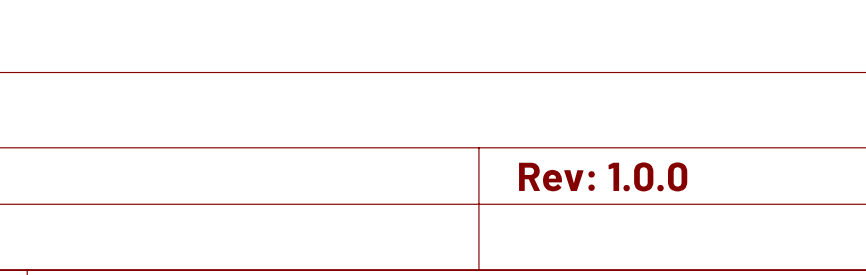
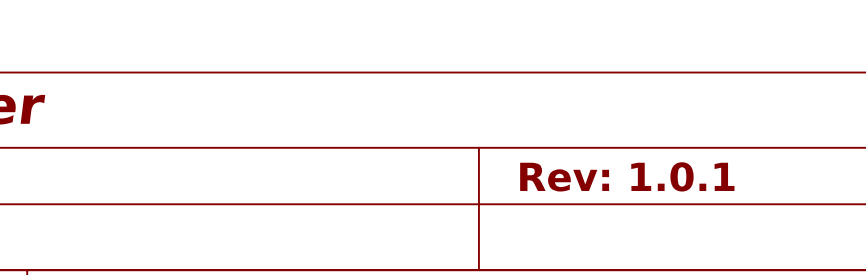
title block: Rev: 1.0.0 (603, 176) -> Rev: 1.0.1 (627, 176)

